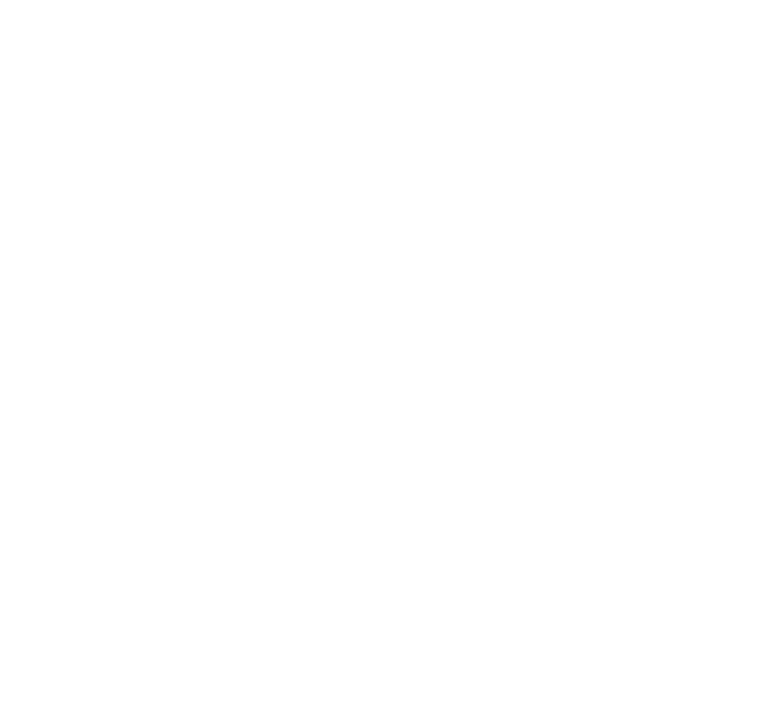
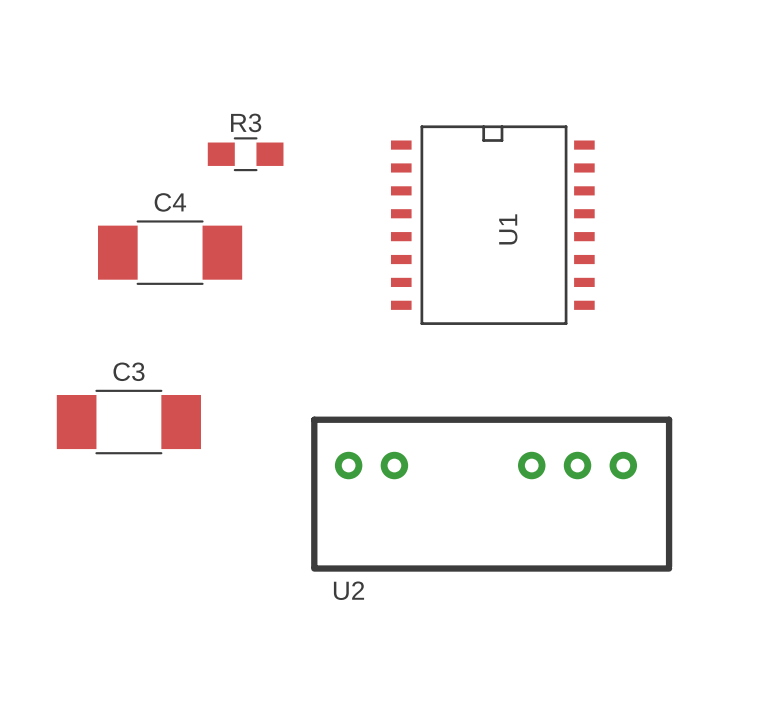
R3: none -> (245, 154)
U1: none -> (492, 225)
C4: none -> (170, 252)
C3: none -> (128, 422)
U2: none -> (491, 494)

